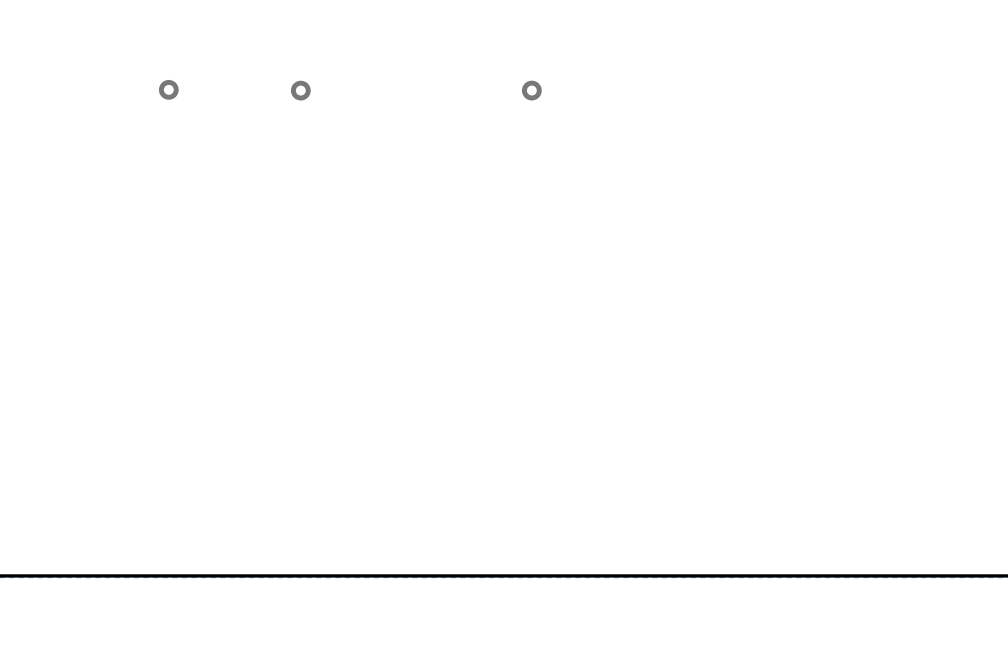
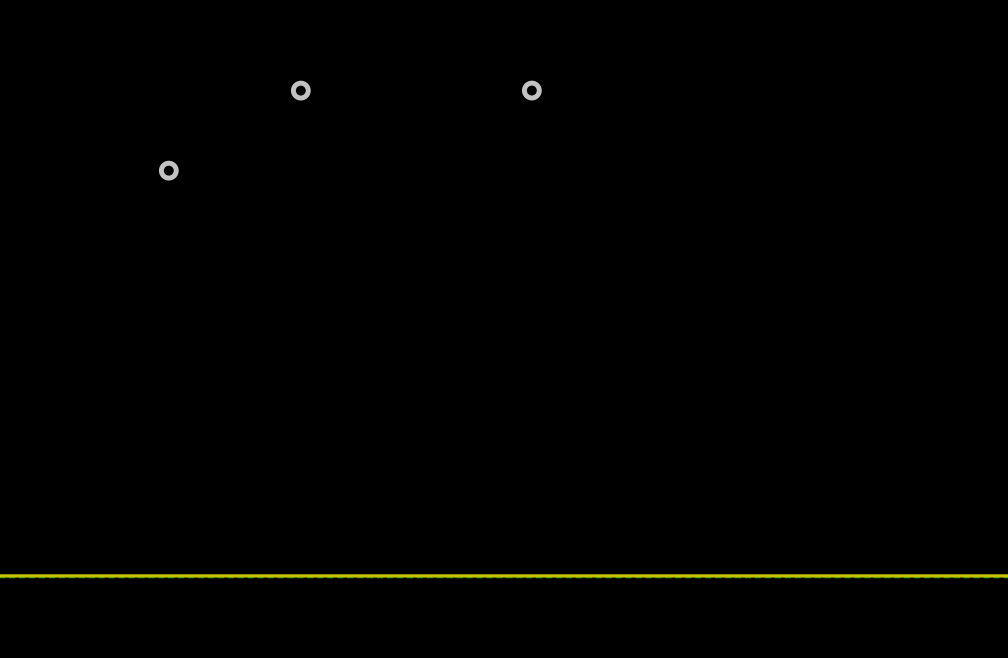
via position: (168, 89) -> (168, 170)

